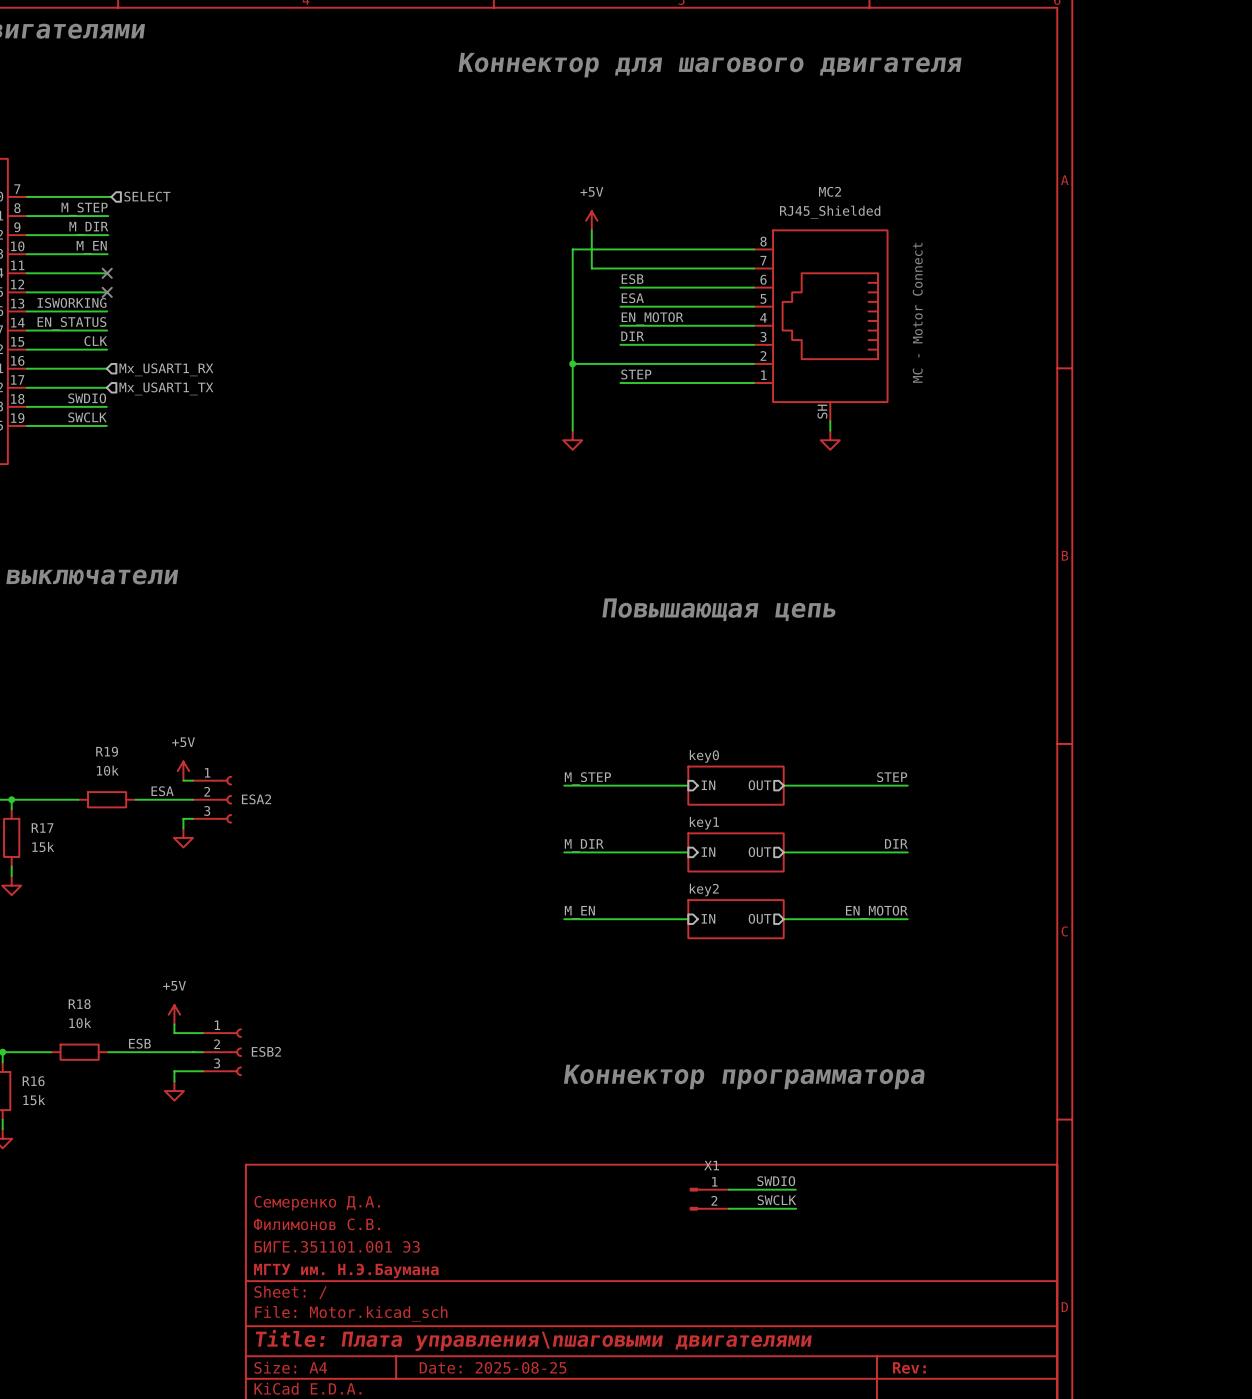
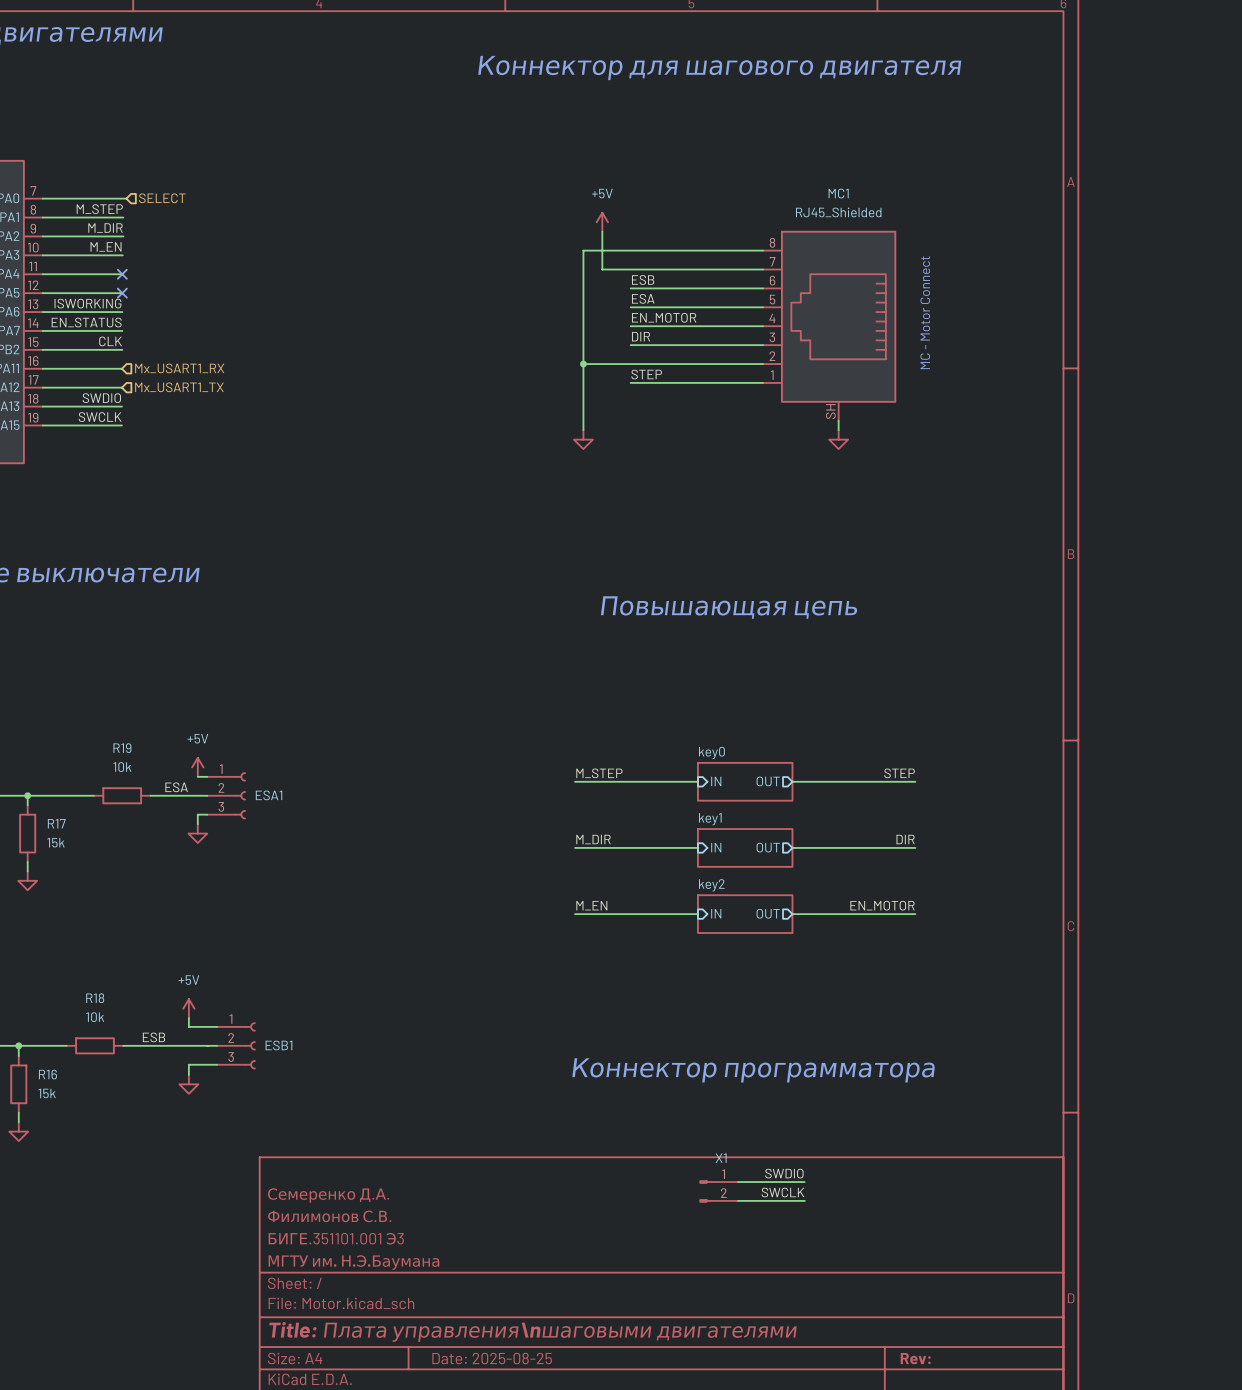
MC2 name: MC2 (830, 191) -> MC1 (838, 193)
ESA2 name: ESA2 (256, 799) -> ESA1 (269, 795)
ESB2 name: ESB2 (266, 1051) -> ESB1 (278, 1045)

